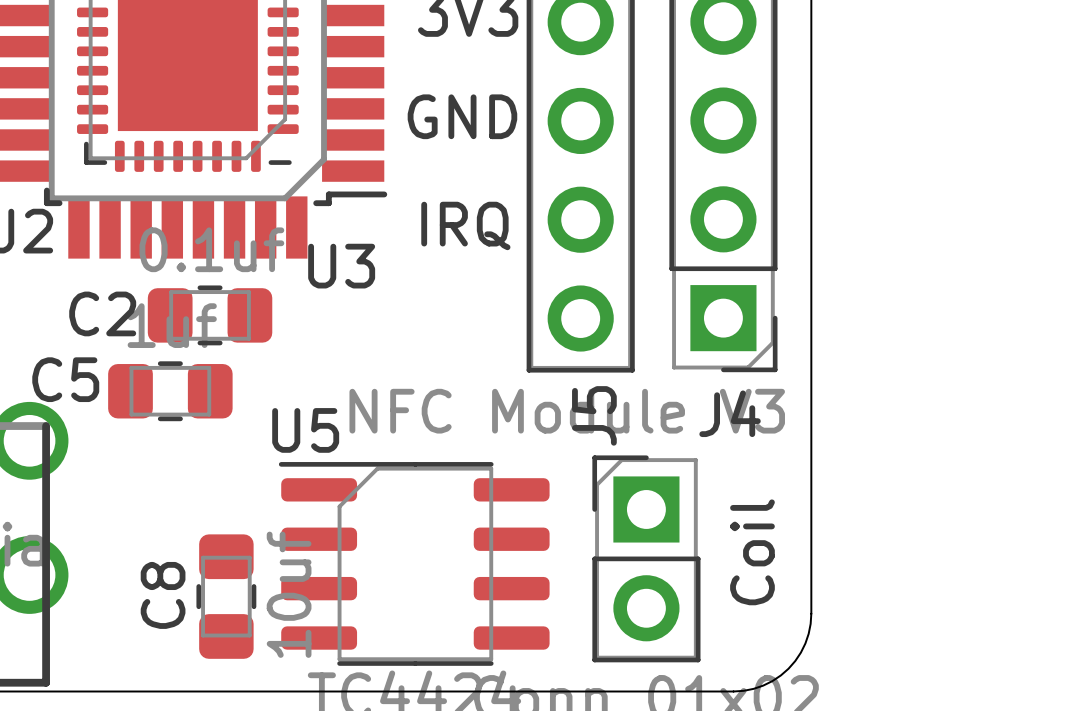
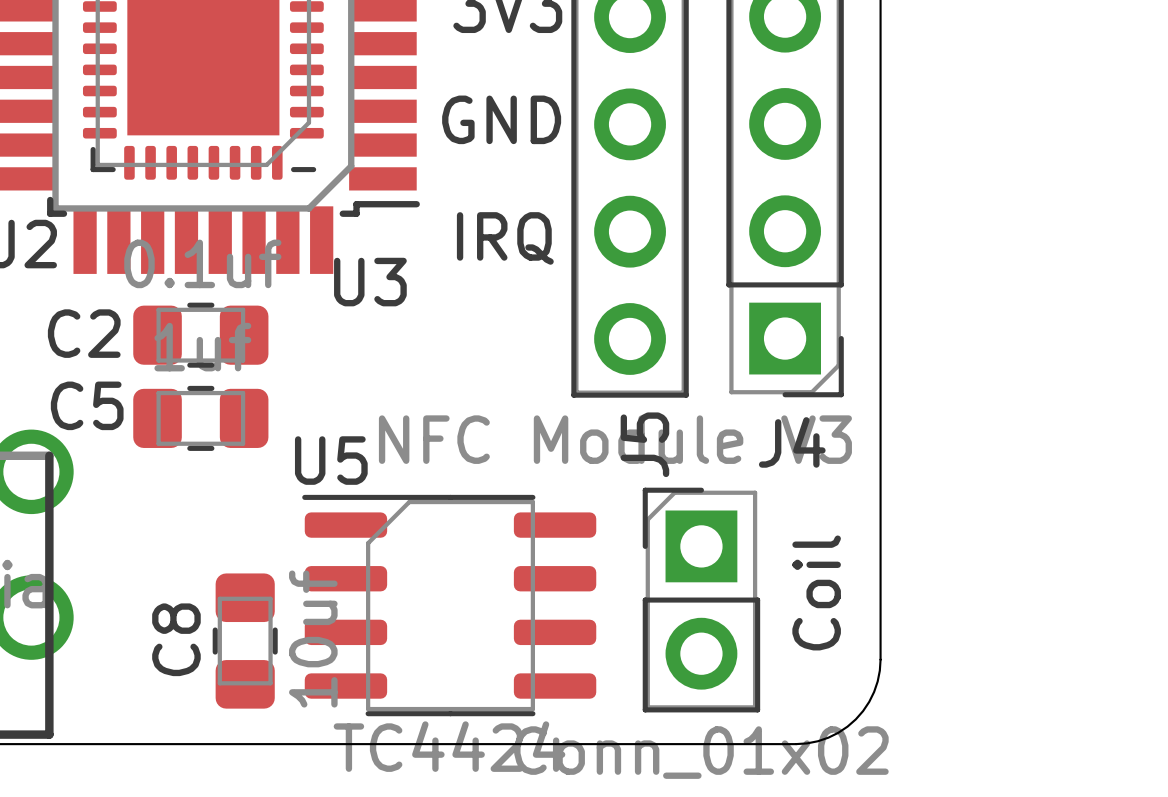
C2 position: (210, 315) -> (200, 335)
C5 position: (170, 391) -> (200, 418)

